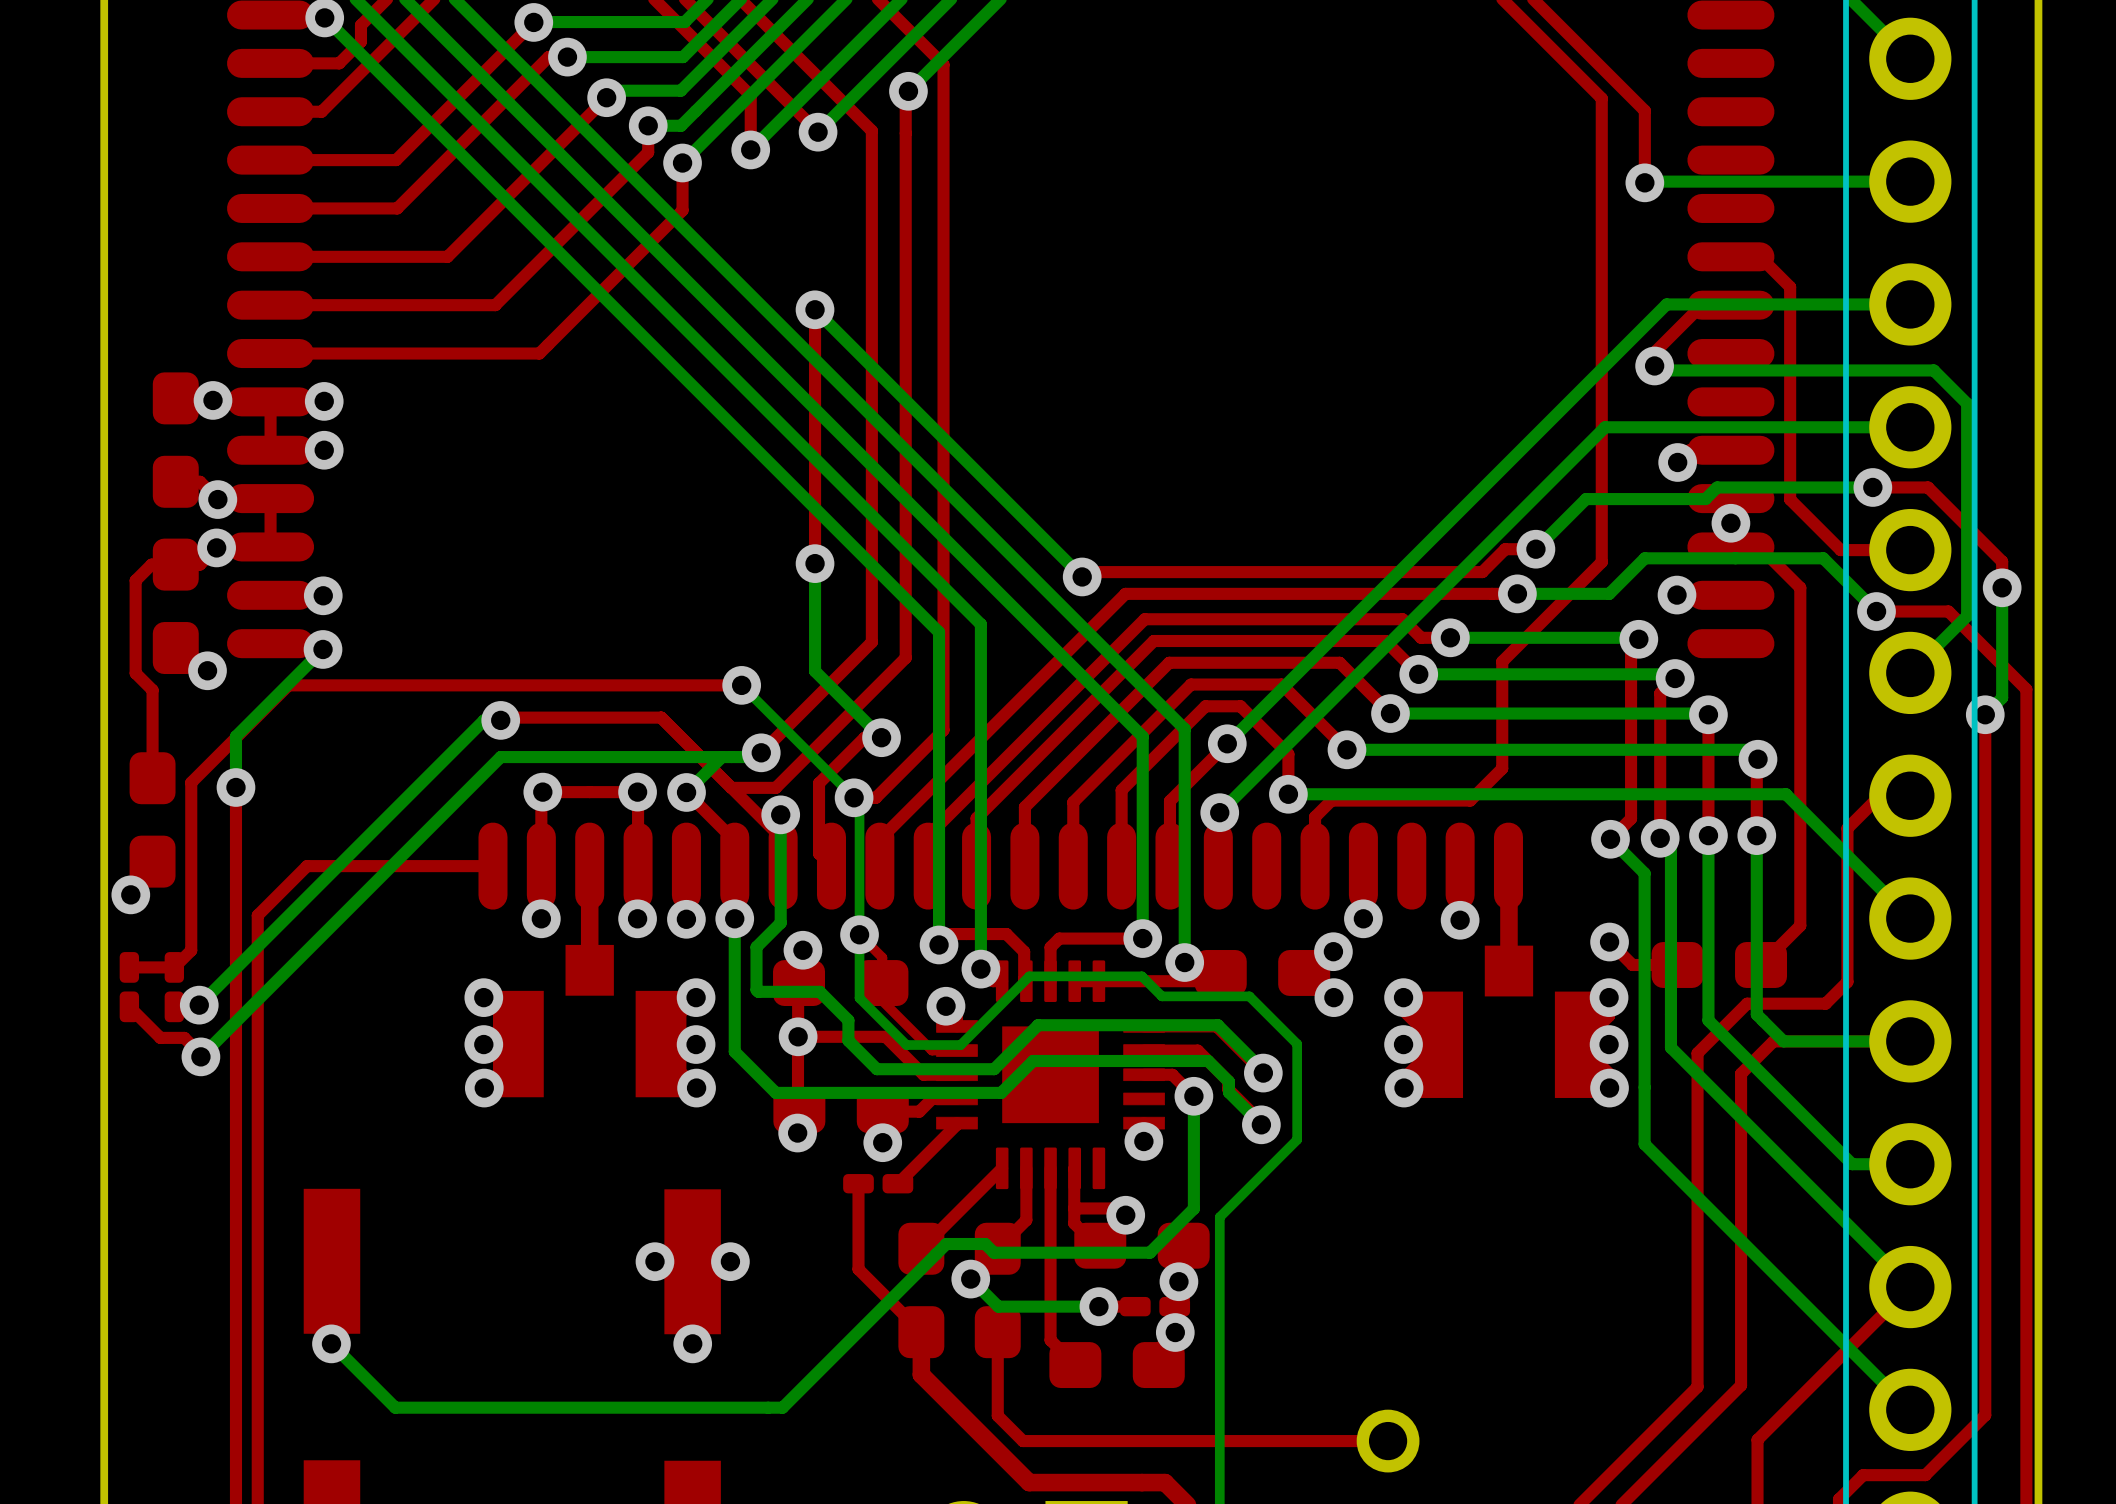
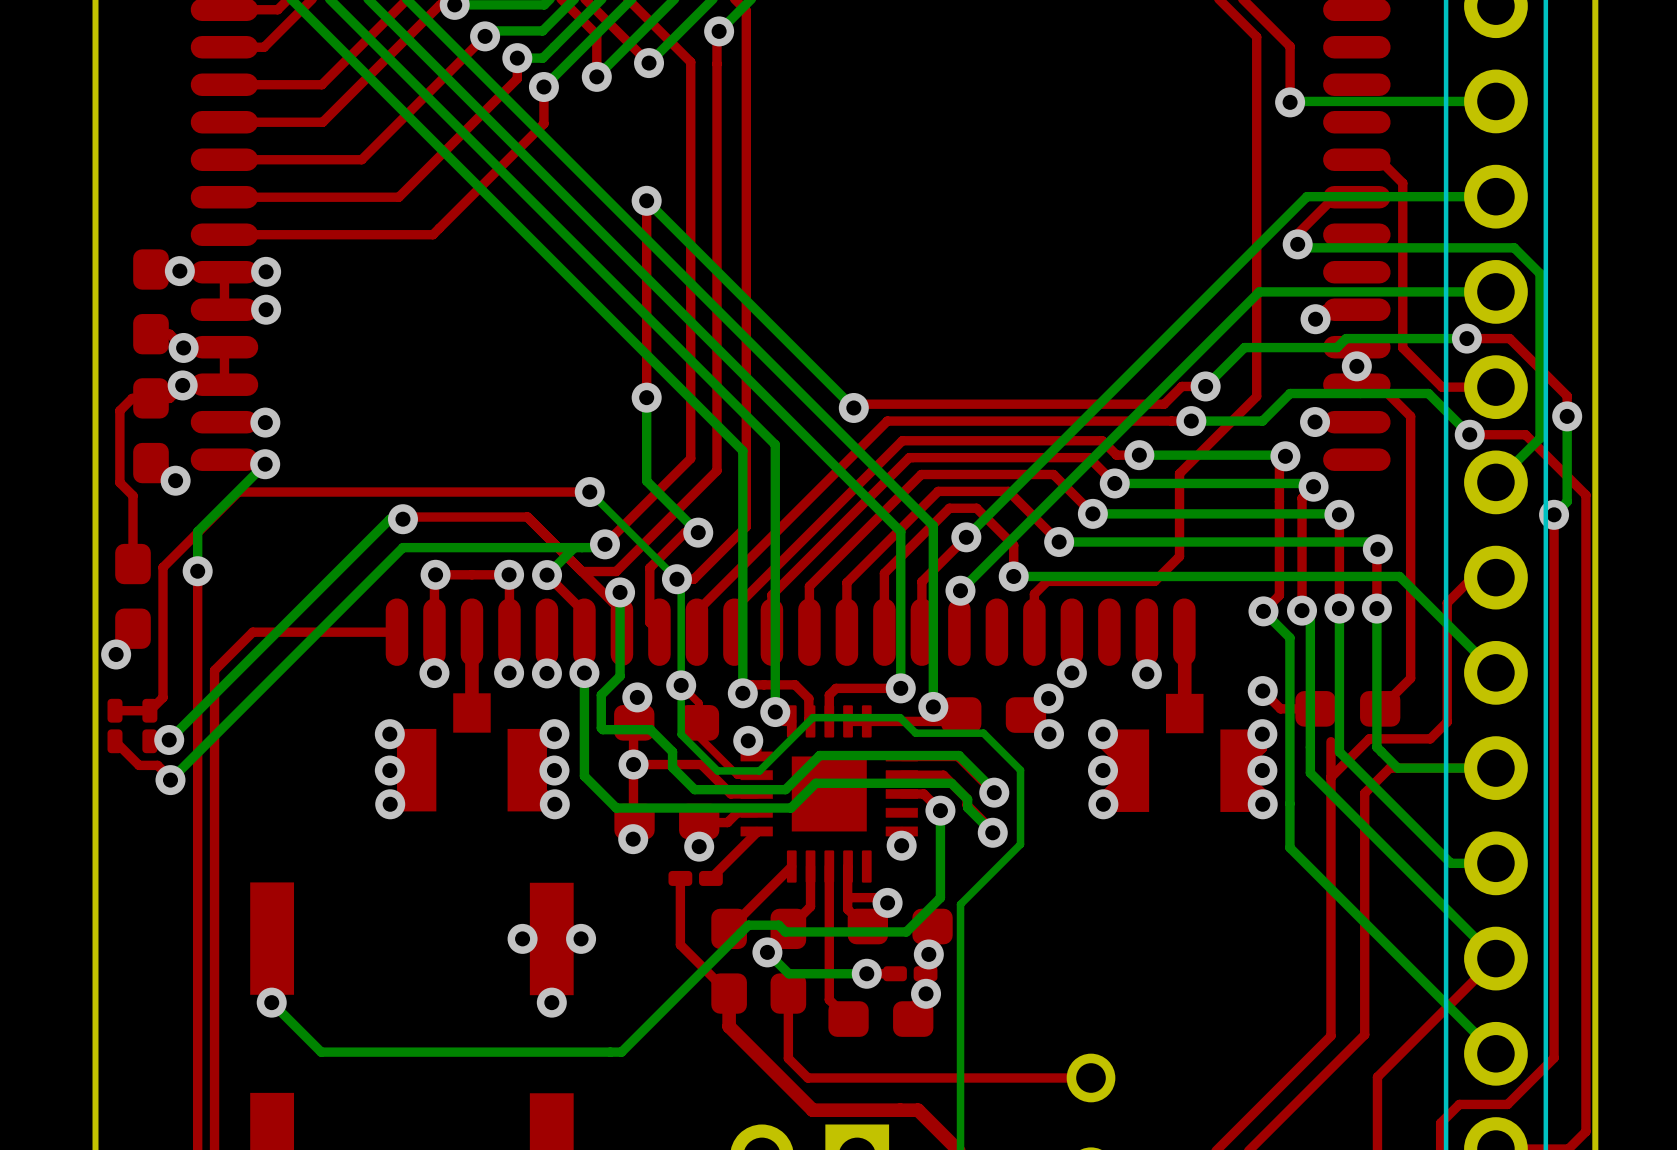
top track: none -> (1330, 741) (1330, 777)

